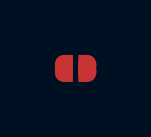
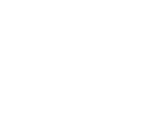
part: (75, 68) -> none

